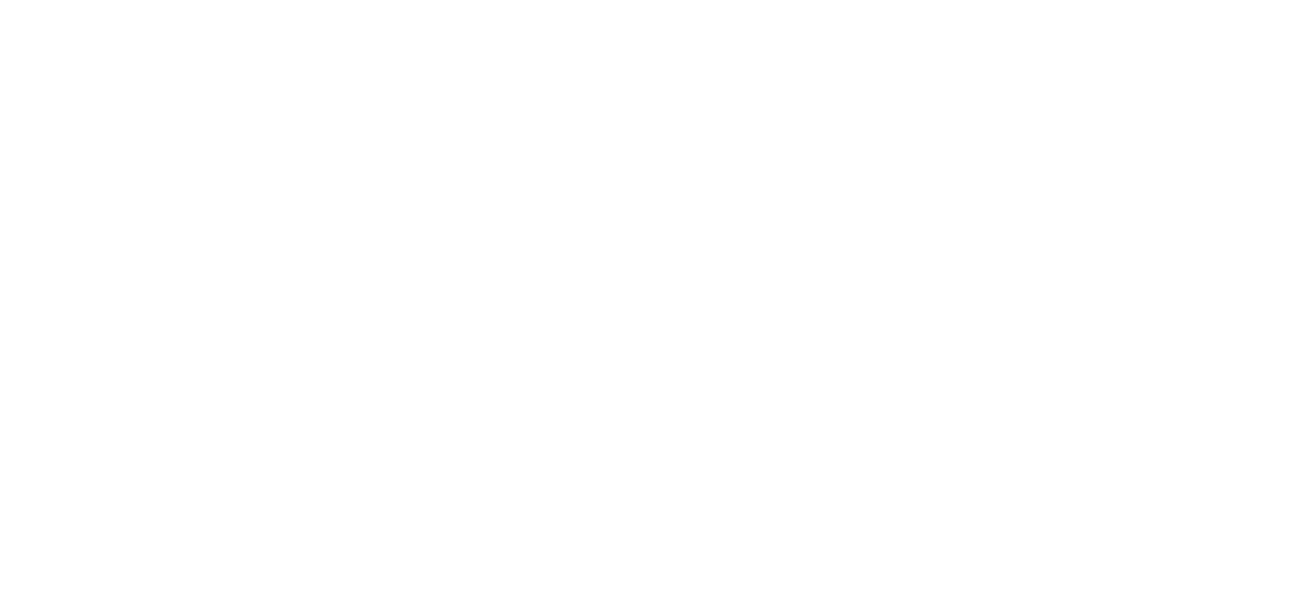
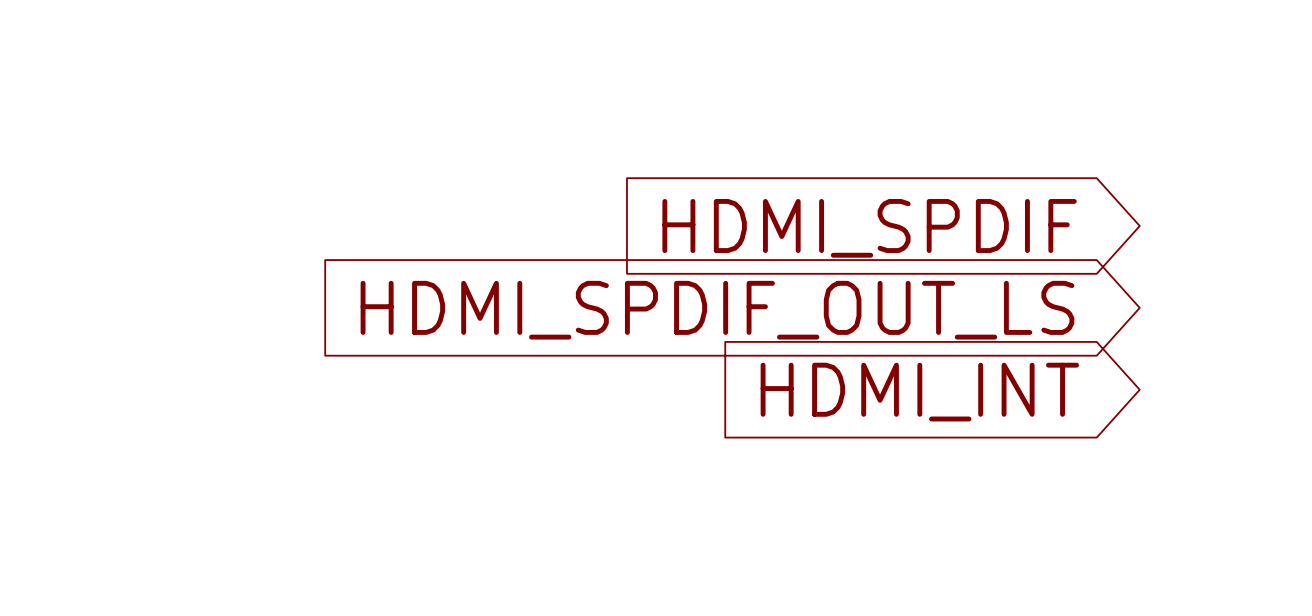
global label: none -> HDMI_SPDIF (869, 228)
global label: none -> HDMI_SPDIF_OUT_LS (717, 310)
global label: none -> HDMI_INT (919, 392)

